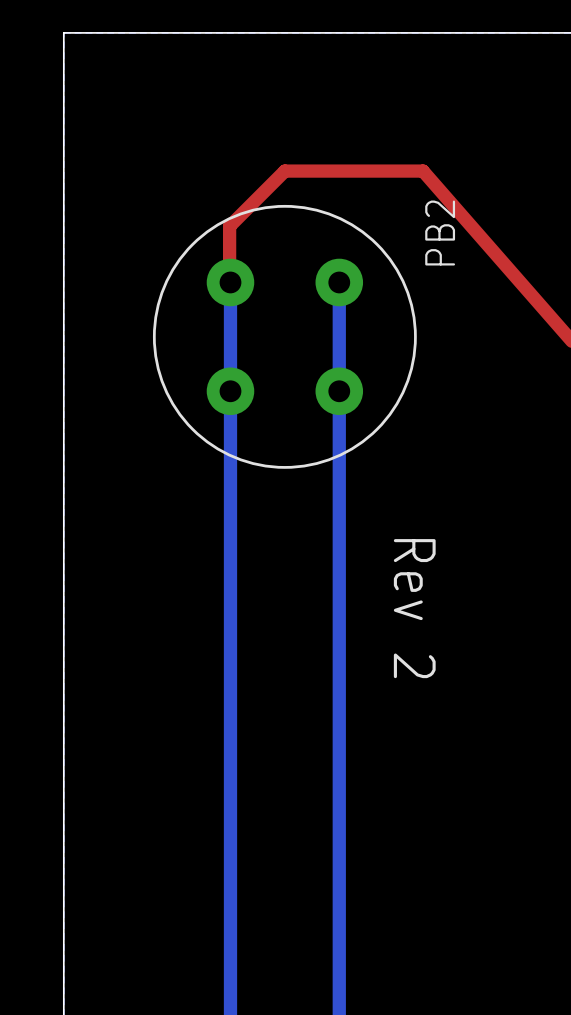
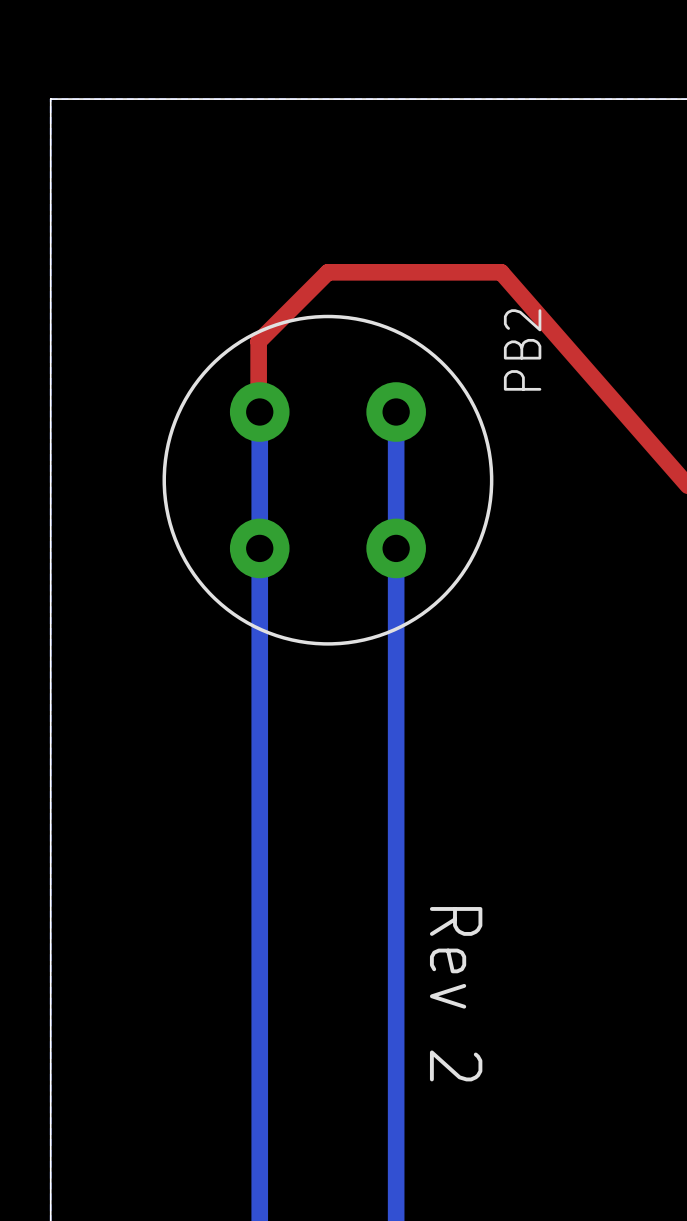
text position: Rev 2 (414, 608) -> Rev 2 (456, 994)

